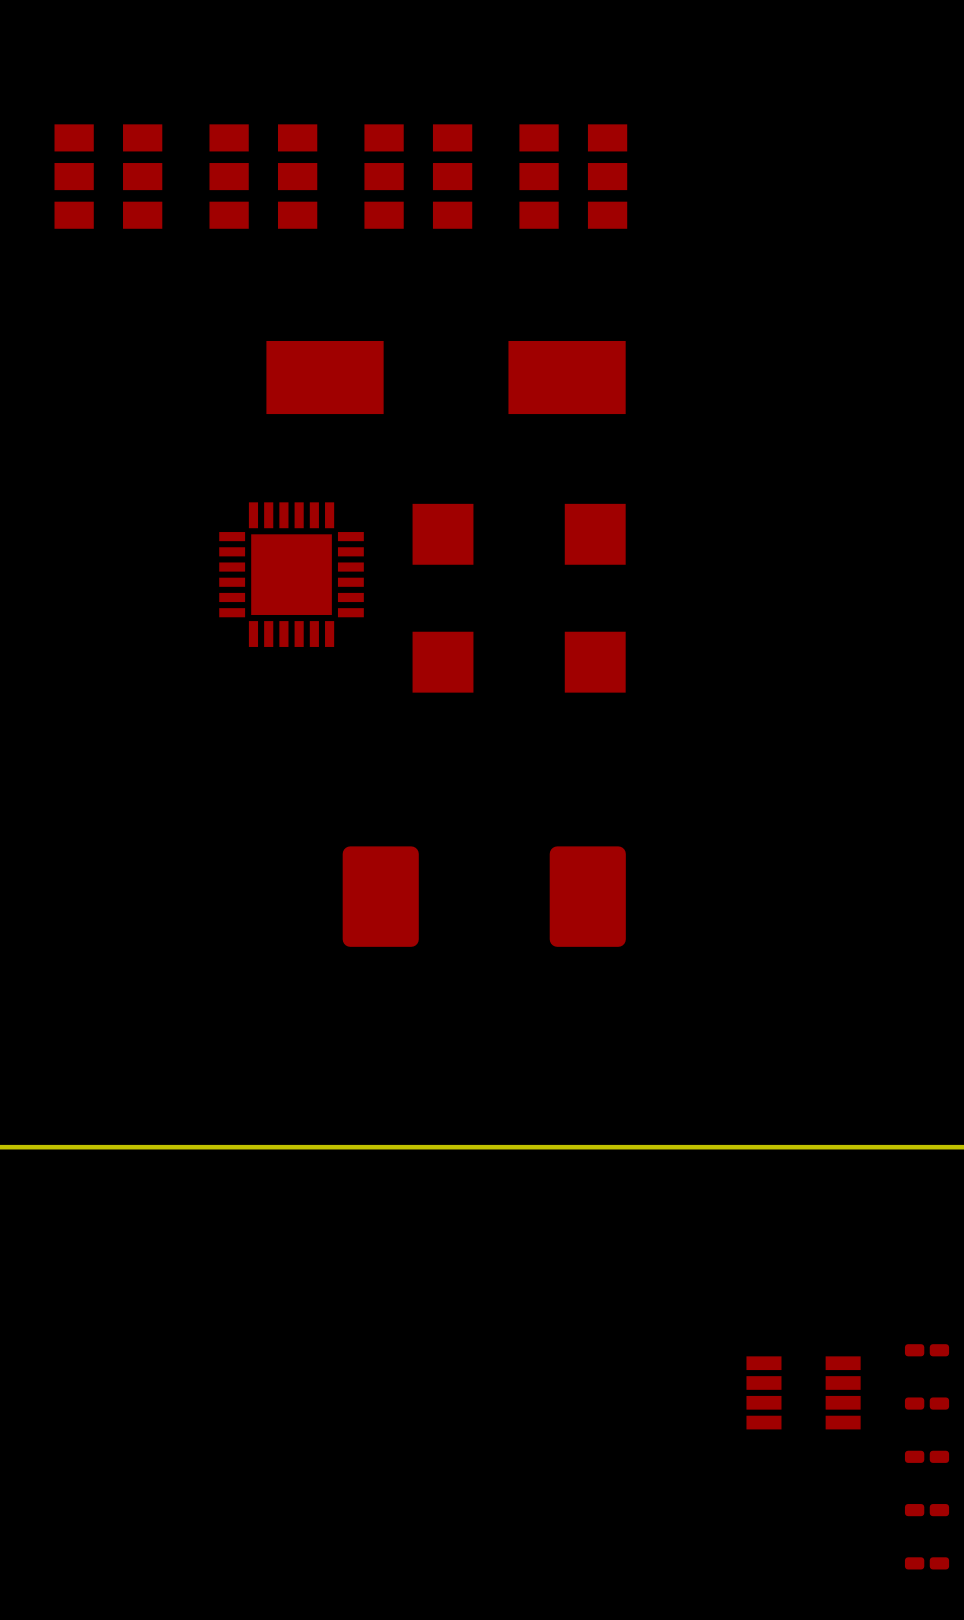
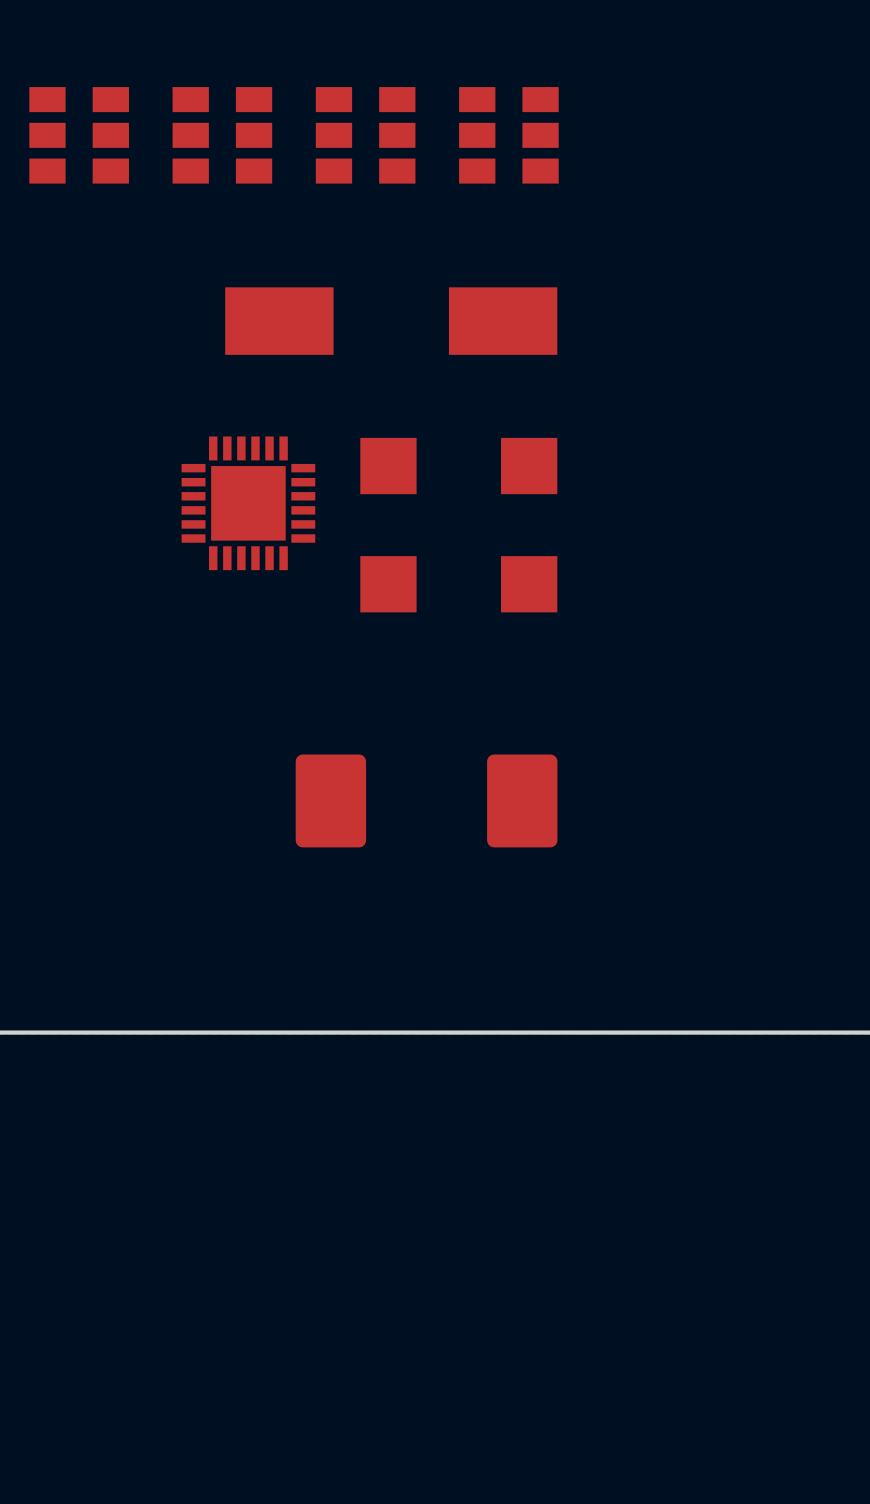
part: (927, 1350) -> none
part: (803, 1392) -> none
part: (927, 1403) -> none
part: (927, 1456) -> none
part: (927, 1510) -> none
part: (927, 1563) -> none

